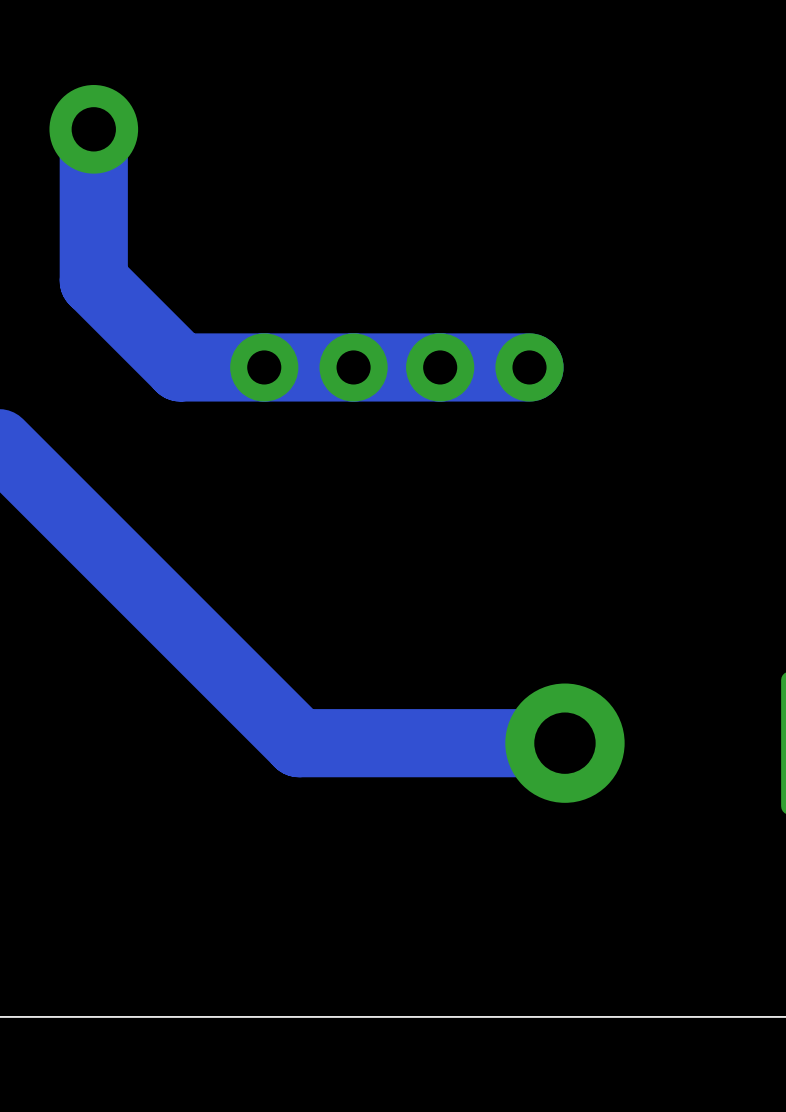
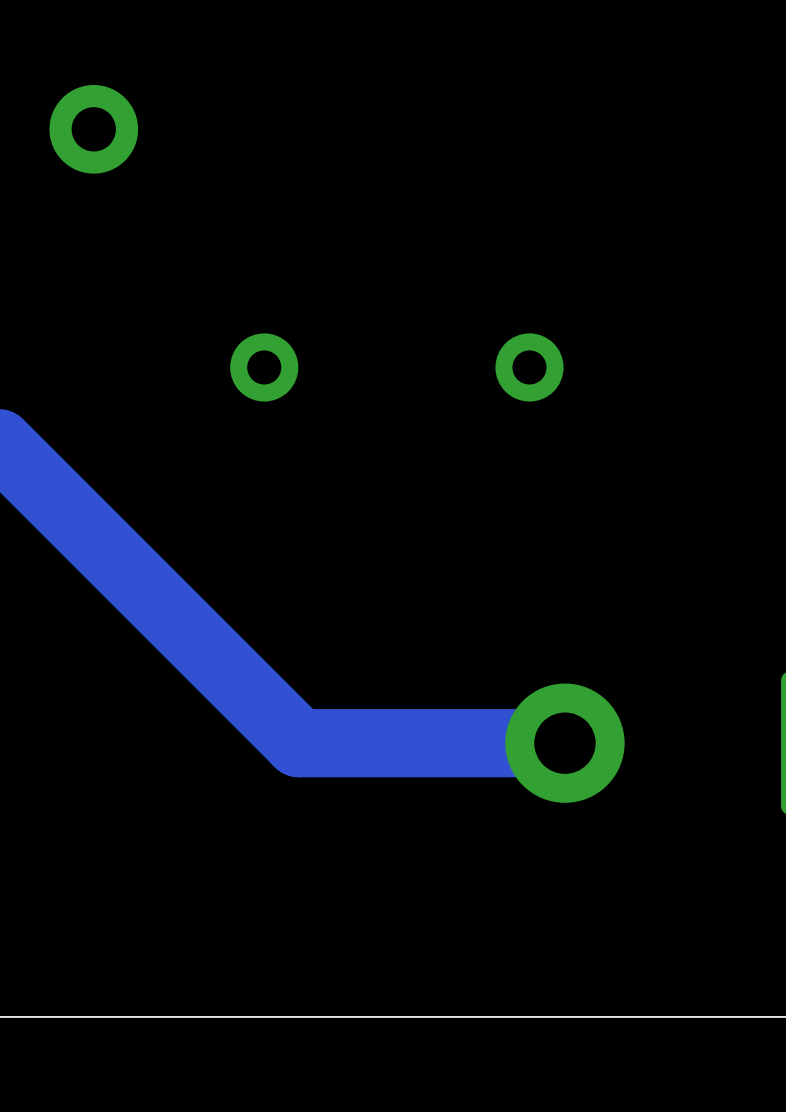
track: (93, 129) (93, 280) (180, 367) (529, 367) -> none
via: (353, 367) -> none
via: (440, 367) -> none

